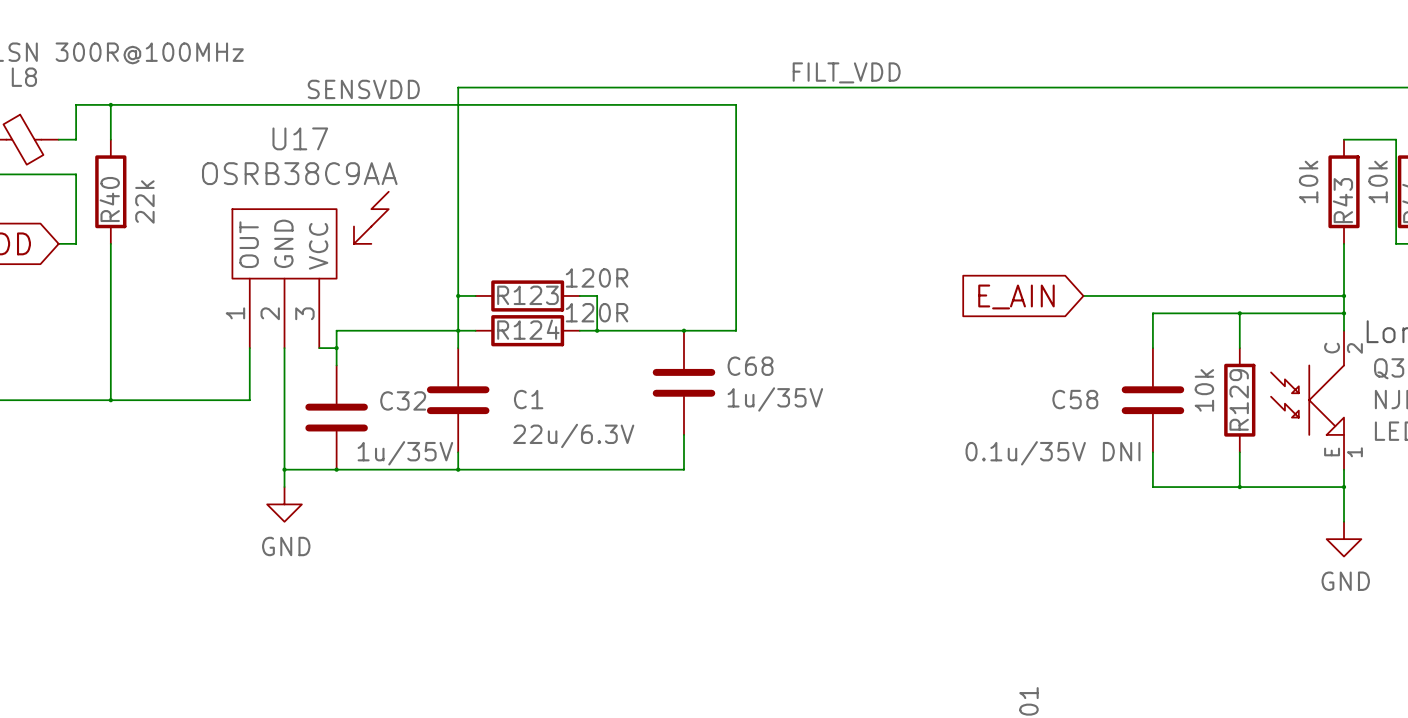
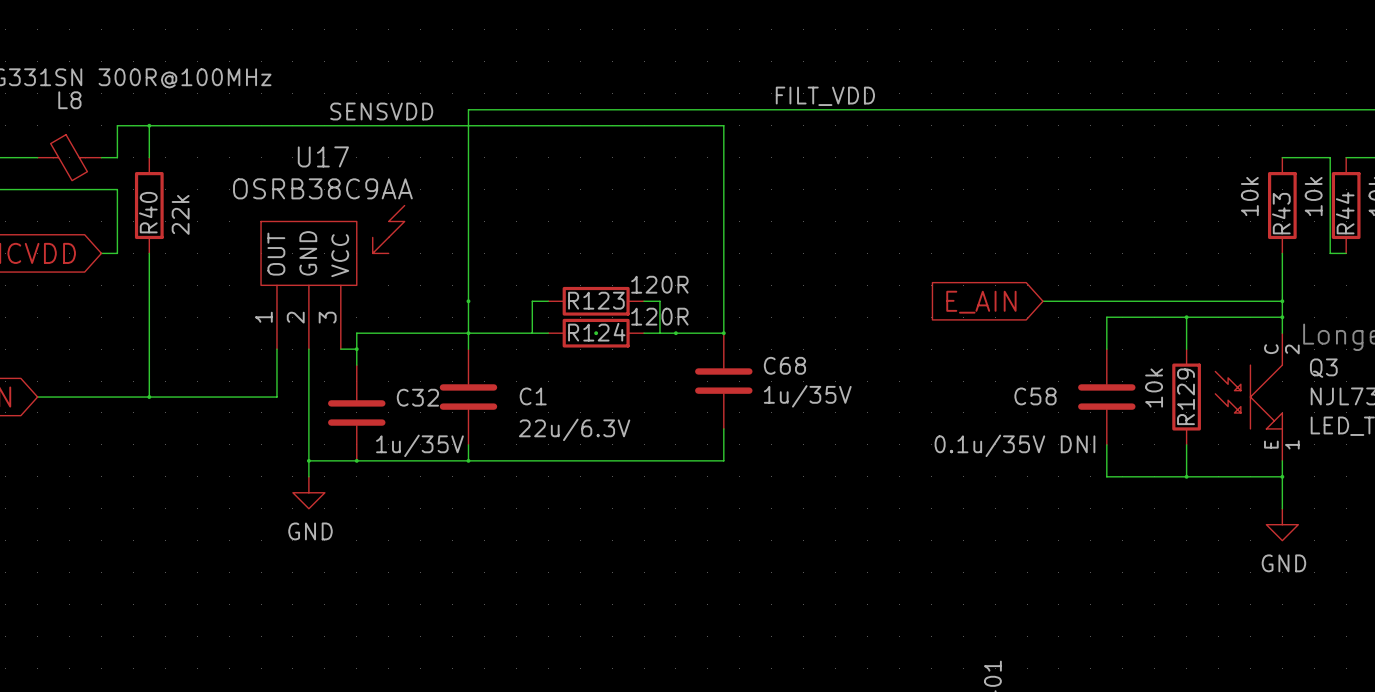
wire: (458, 295) (475, 295) -> none
R123 position: (527, 295) -> (596, 301)
wire: none -> (548, 301) (532, 301) (532, 333)
wire: (579, 295) (597, 295) (597, 330) -> (644, 301) (659, 301) (659, 333)
R124 position: (527, 330) -> (596, 333)
wire: (579, 330) (649, 330) -> (484, 333) (548, 333)
junction: none -> (723, 333)
C68 position: (683, 382) -> (723, 381)
wire: (683, 434) (683, 469) -> (723, 428) (723, 460) (675, 460)

